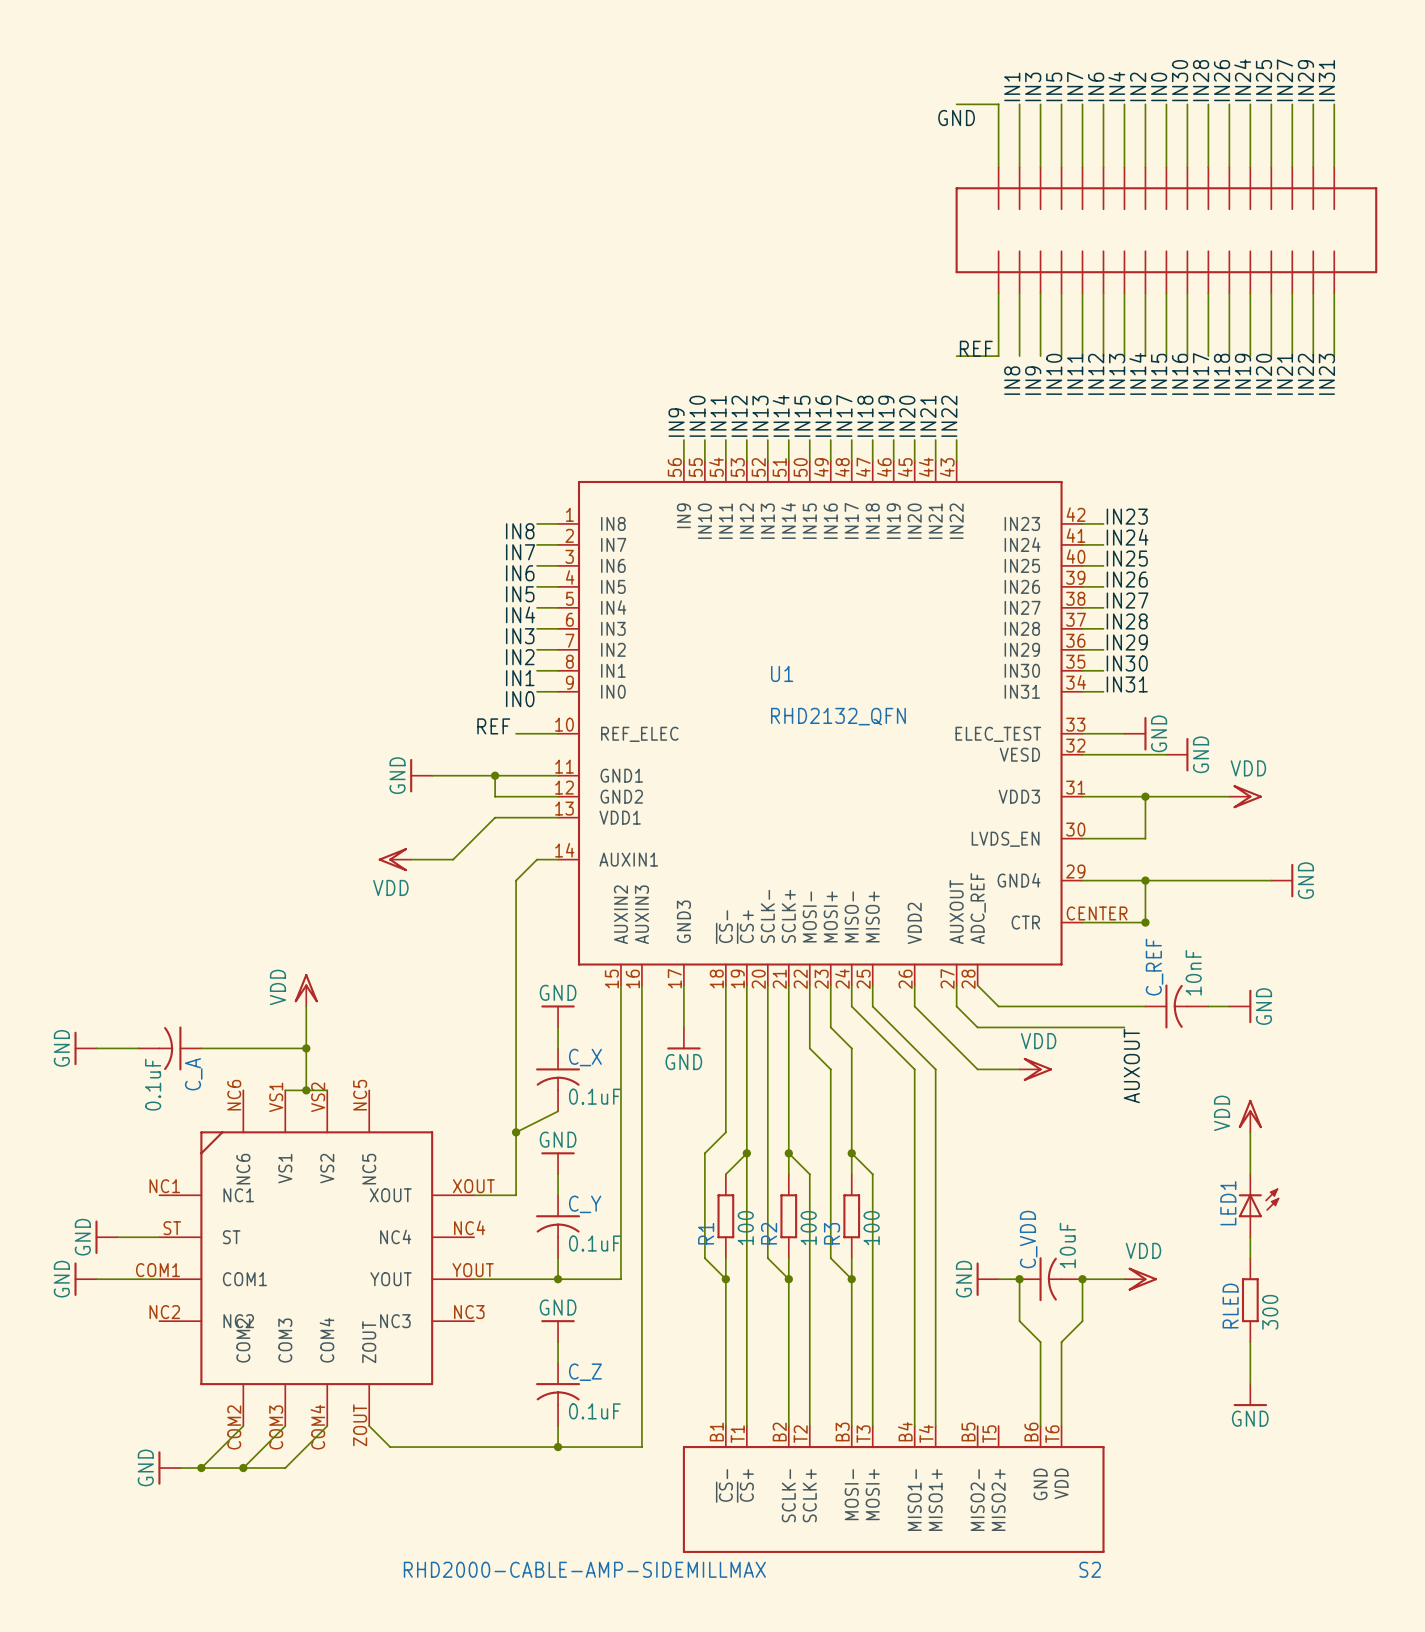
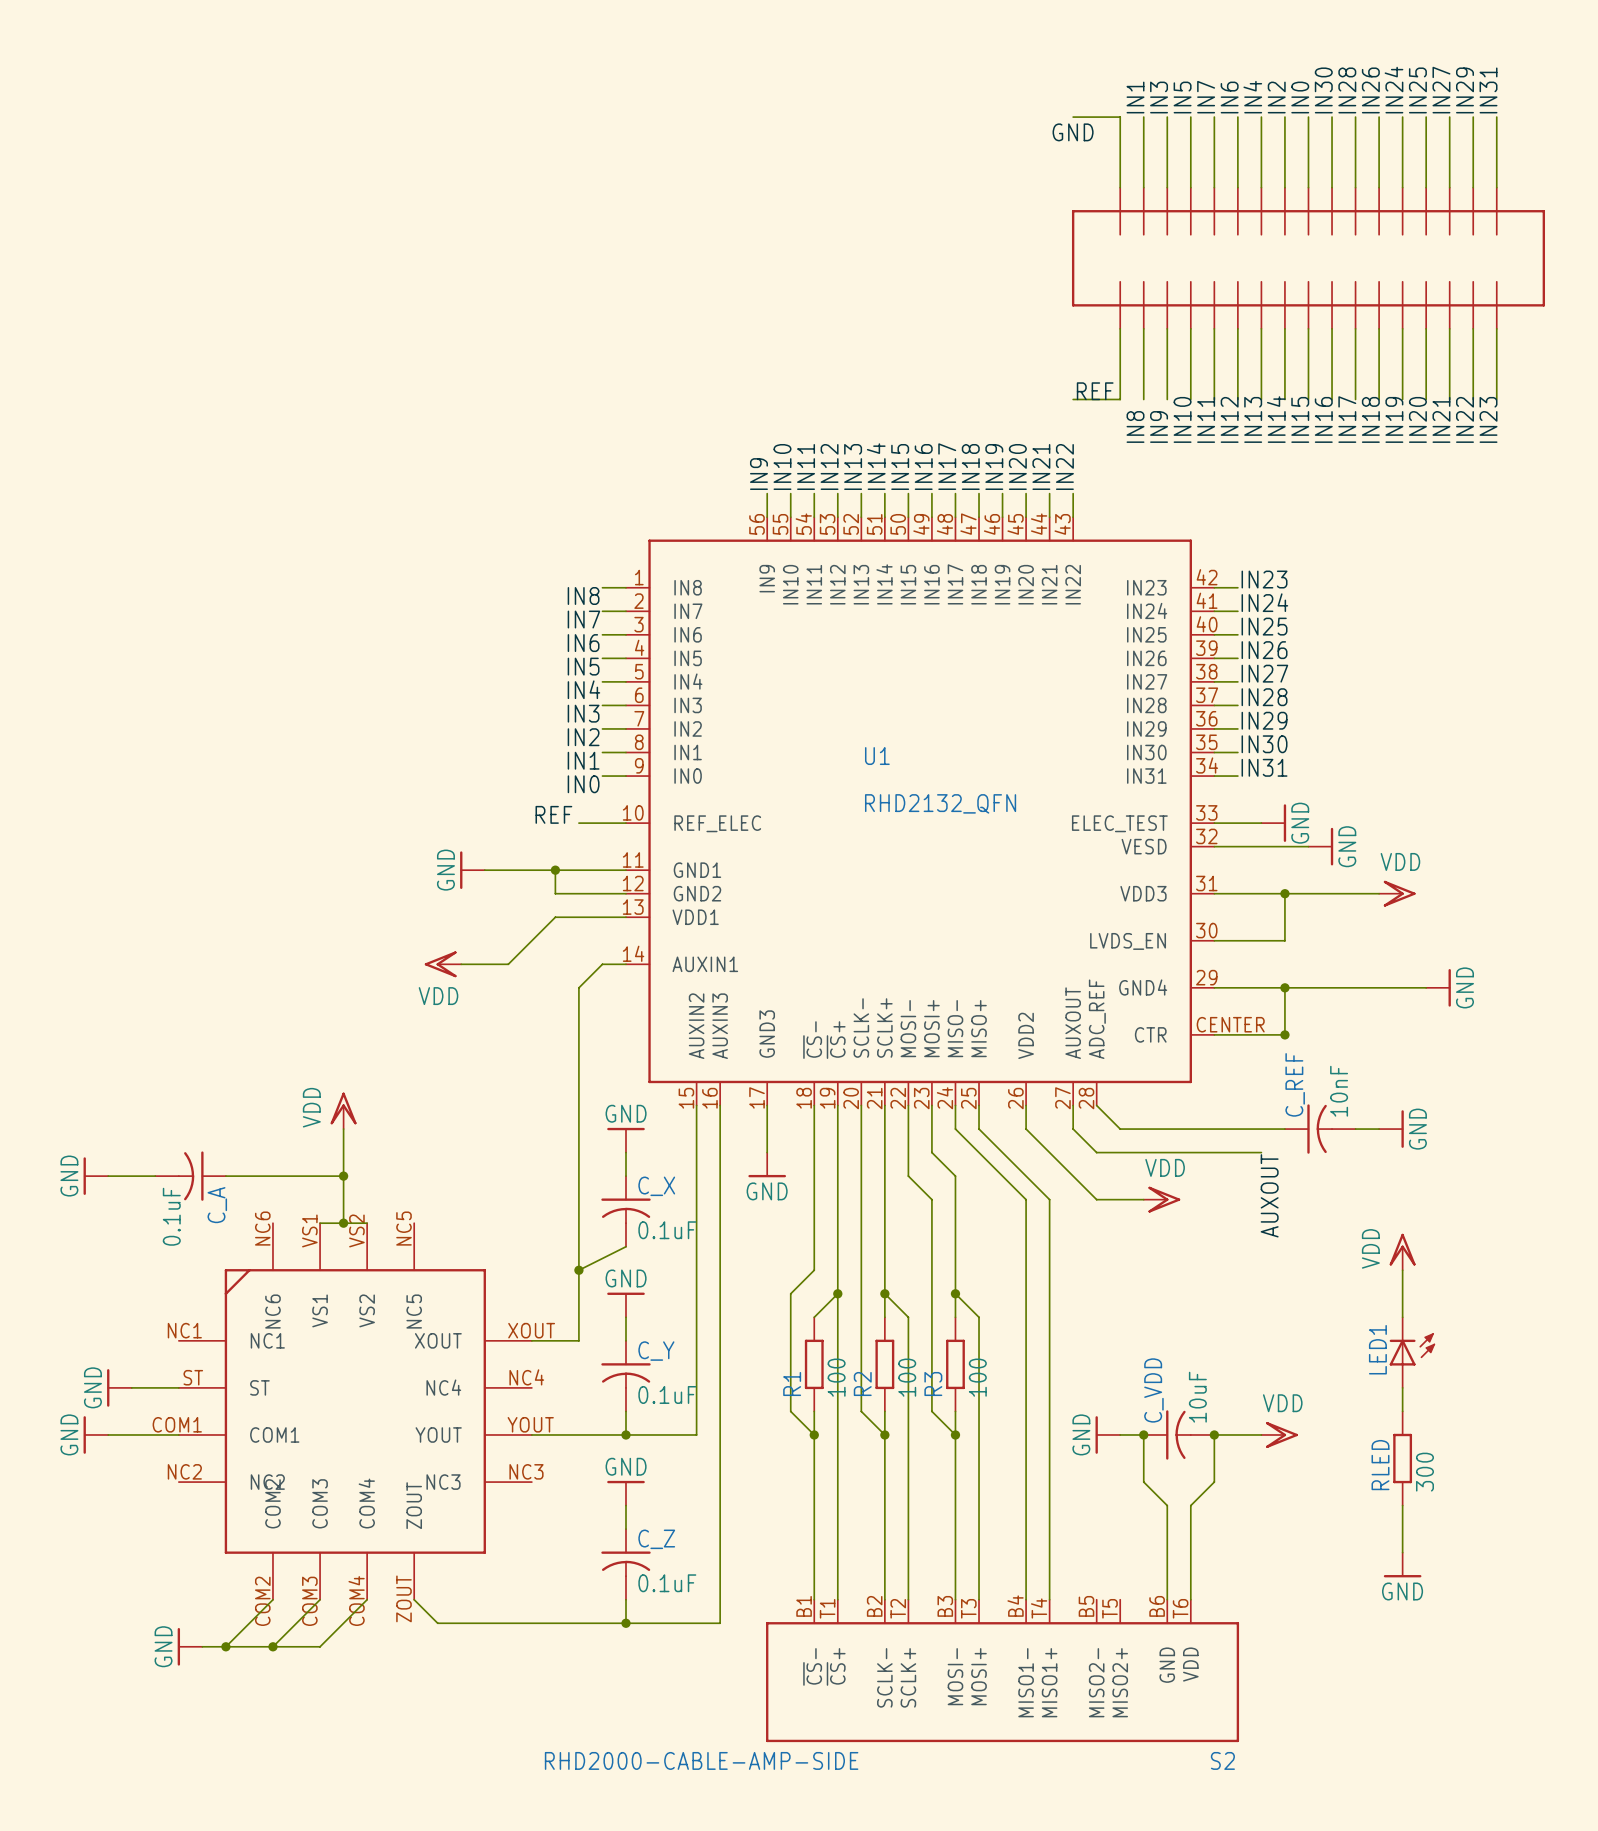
S2 value: RHD2000-CABLE-AMP-SIDEMILLMAX (584, 1569) -> RHD2000-CABLE-AMP-SIDE (701, 1760)

